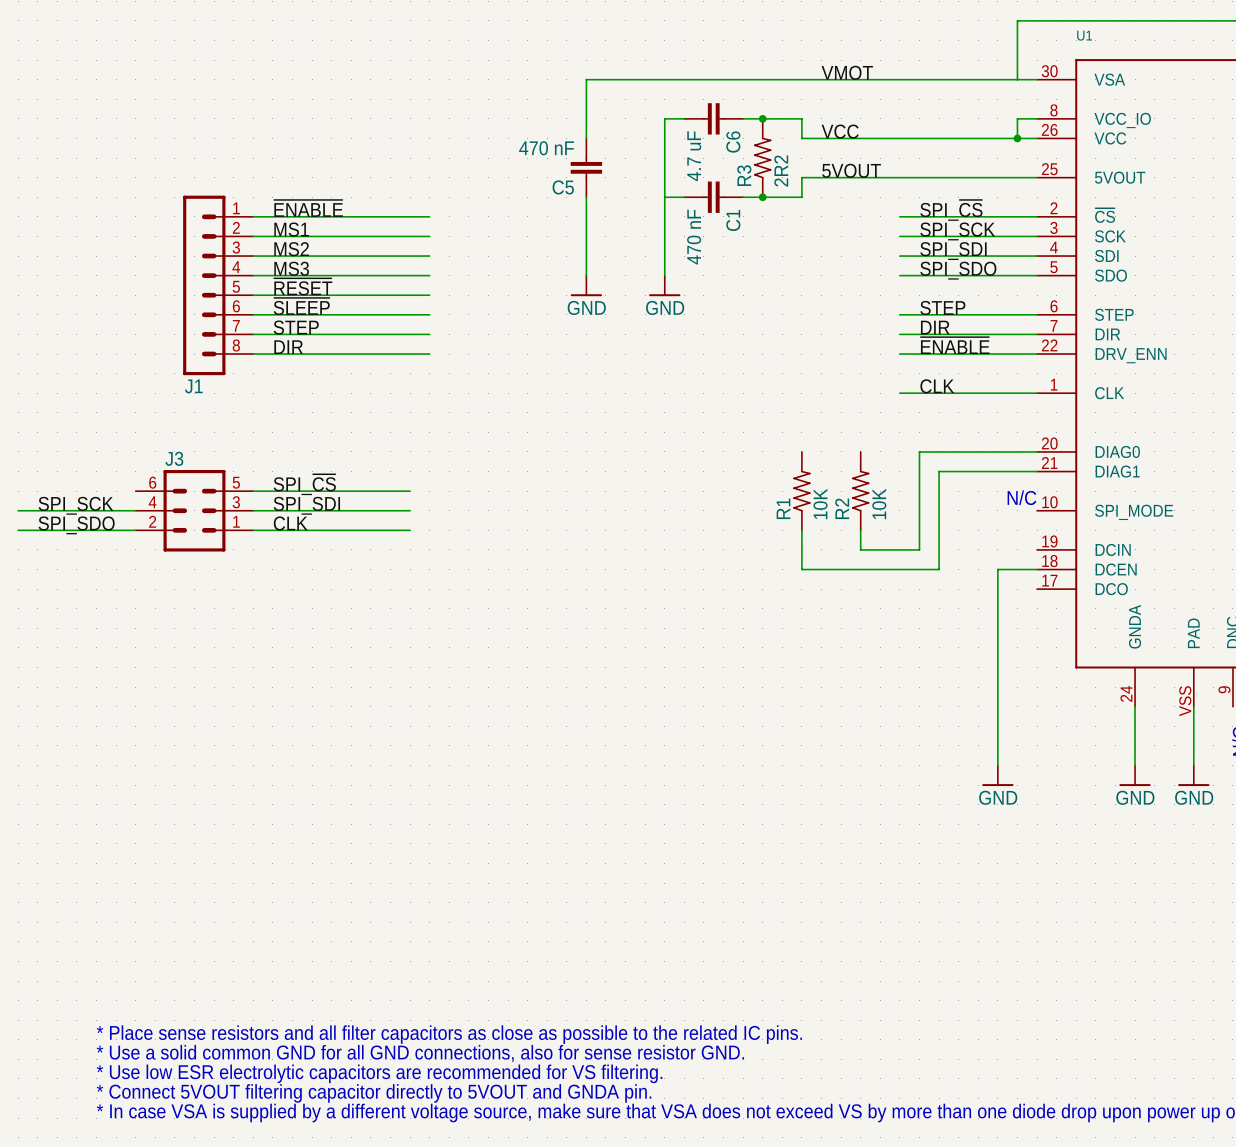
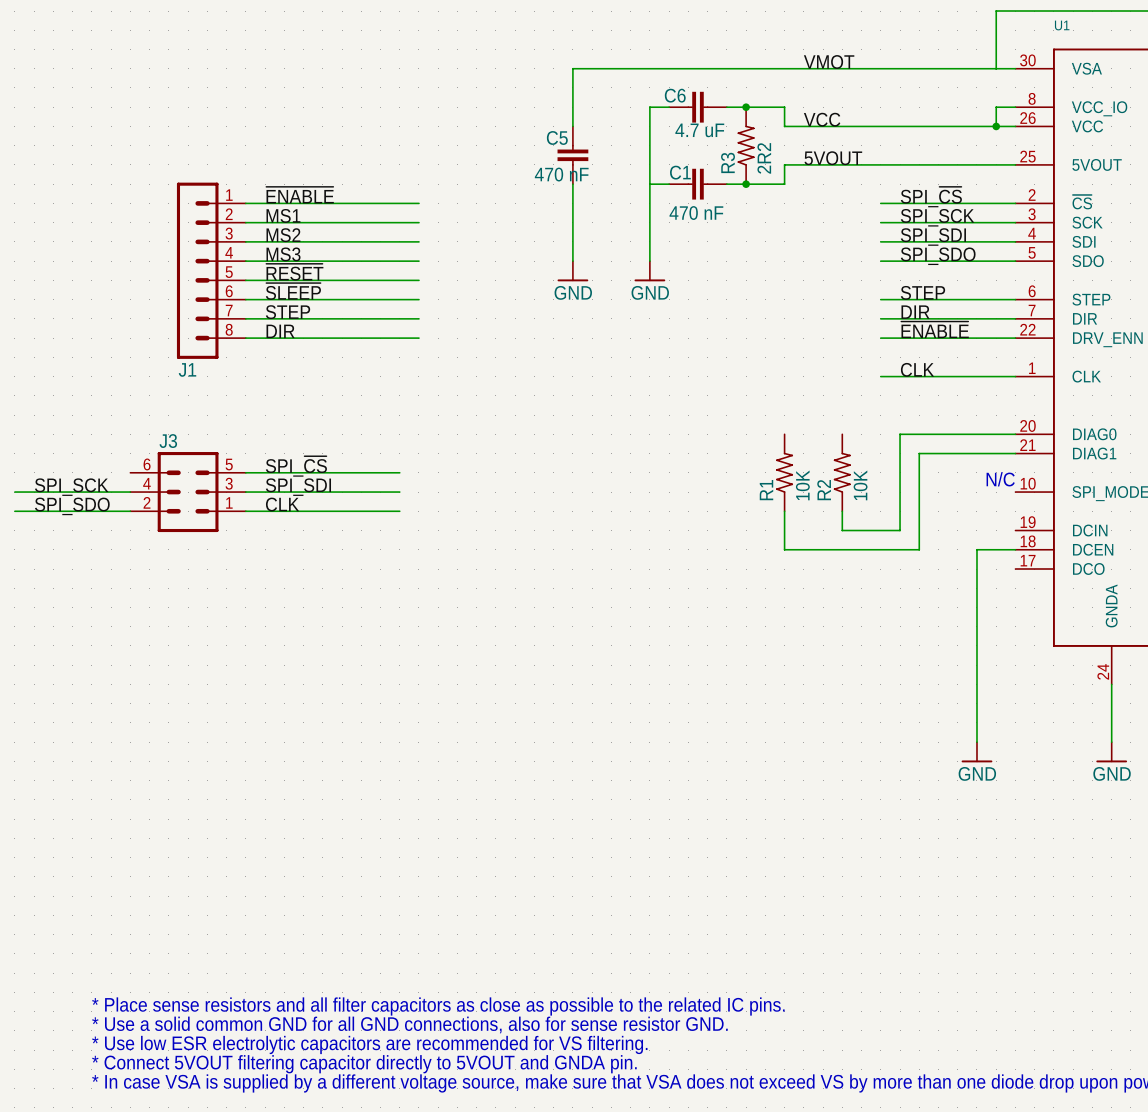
C6 name rotation: 0° (733, 142) -> 90° clockwise (675, 95)
C6 name position: C6 (733, 142) -> C6 (675, 95)
C5 value position: 470 nF (546, 148) -> 470 nF (561, 174)
C6 value rotation: 0° (694, 156) -> 90° clockwise (699, 130)
C5 name position: C5 (563, 187) -> C5 (557, 137)
C1 name rotation: 0° (733, 220) -> 90° clockwise (680, 172)
C1 name position: C1 (733, 220) -> C1 (680, 172)
C1 value rotation: 0° (694, 237) -> 90° clockwise (696, 213)

